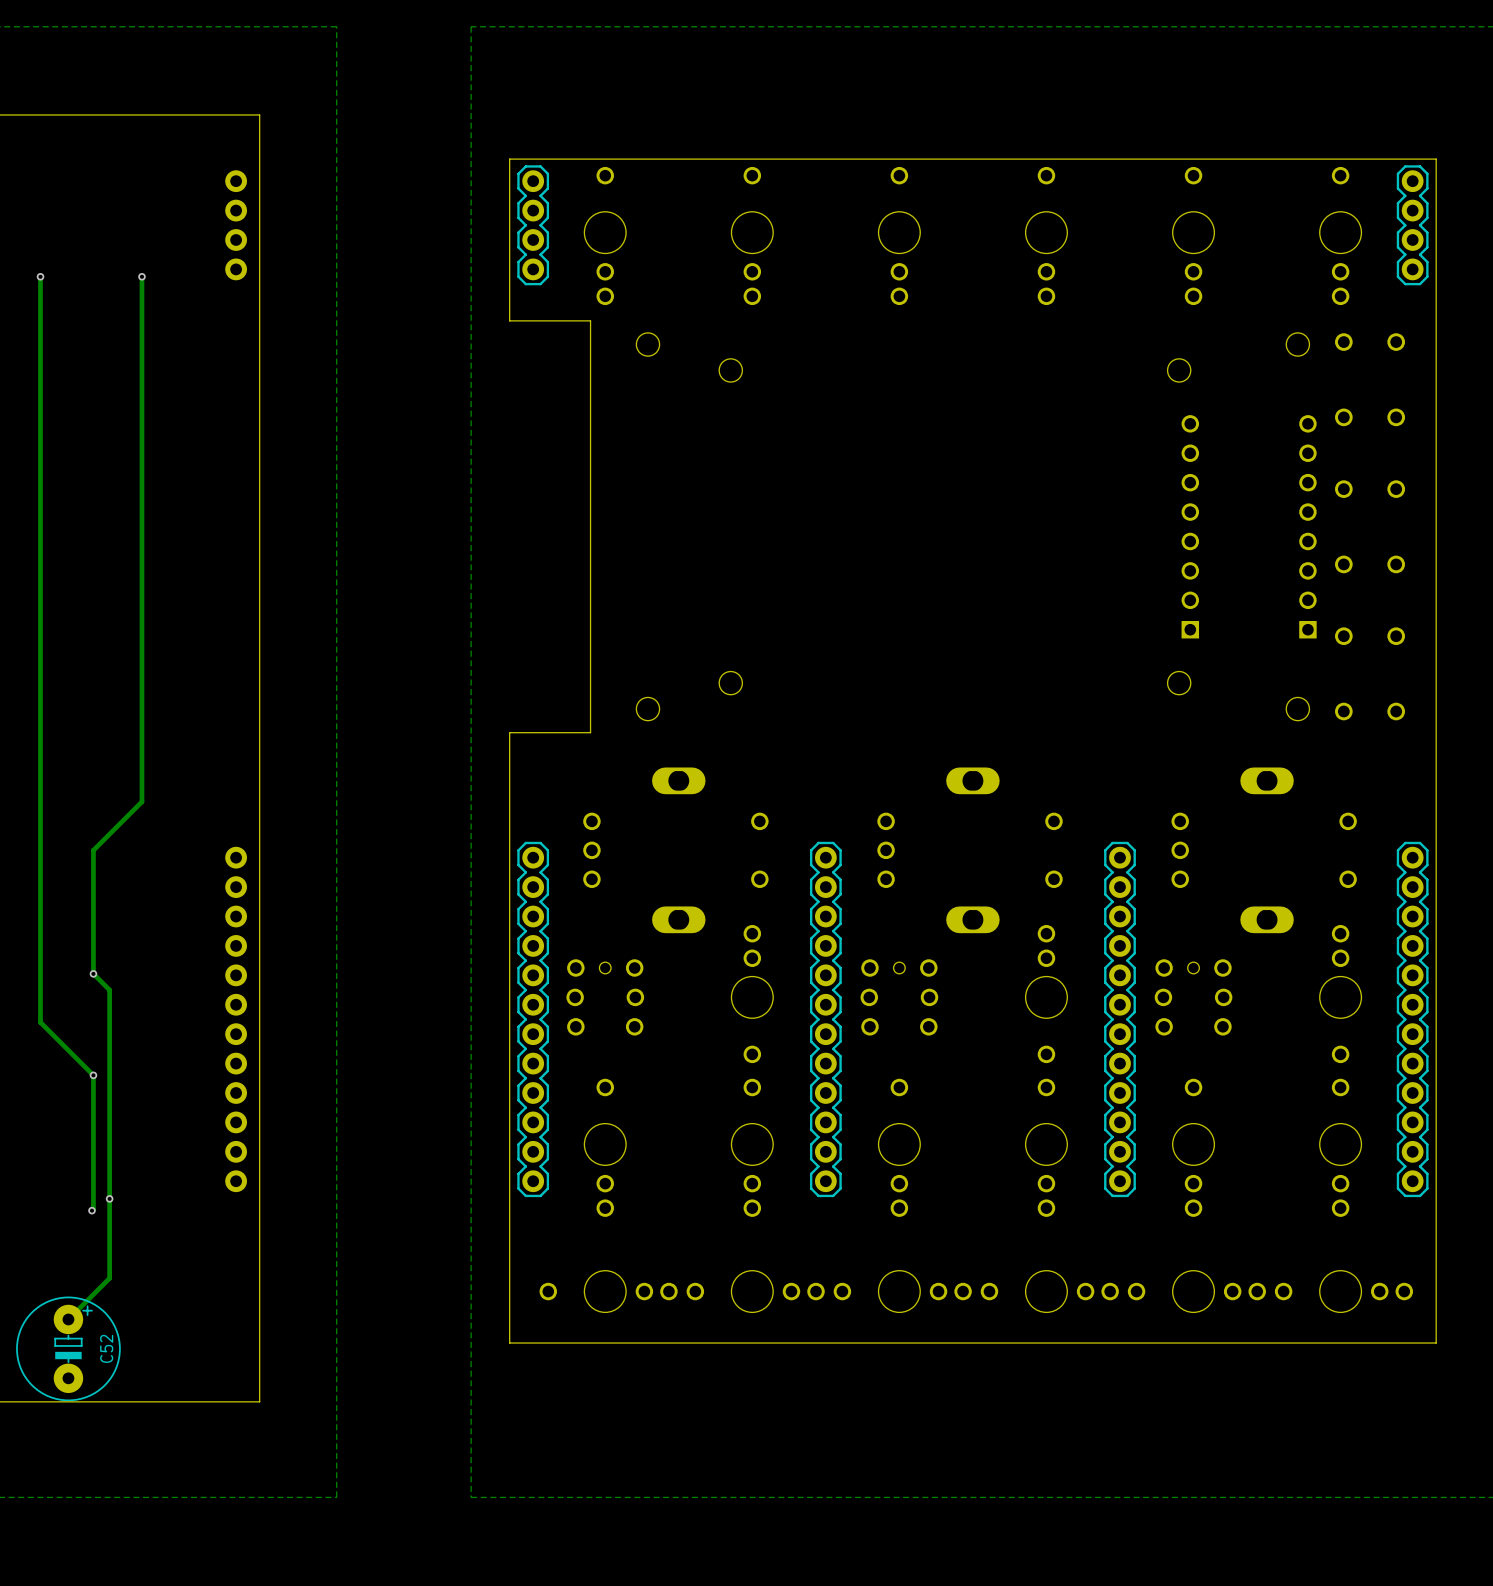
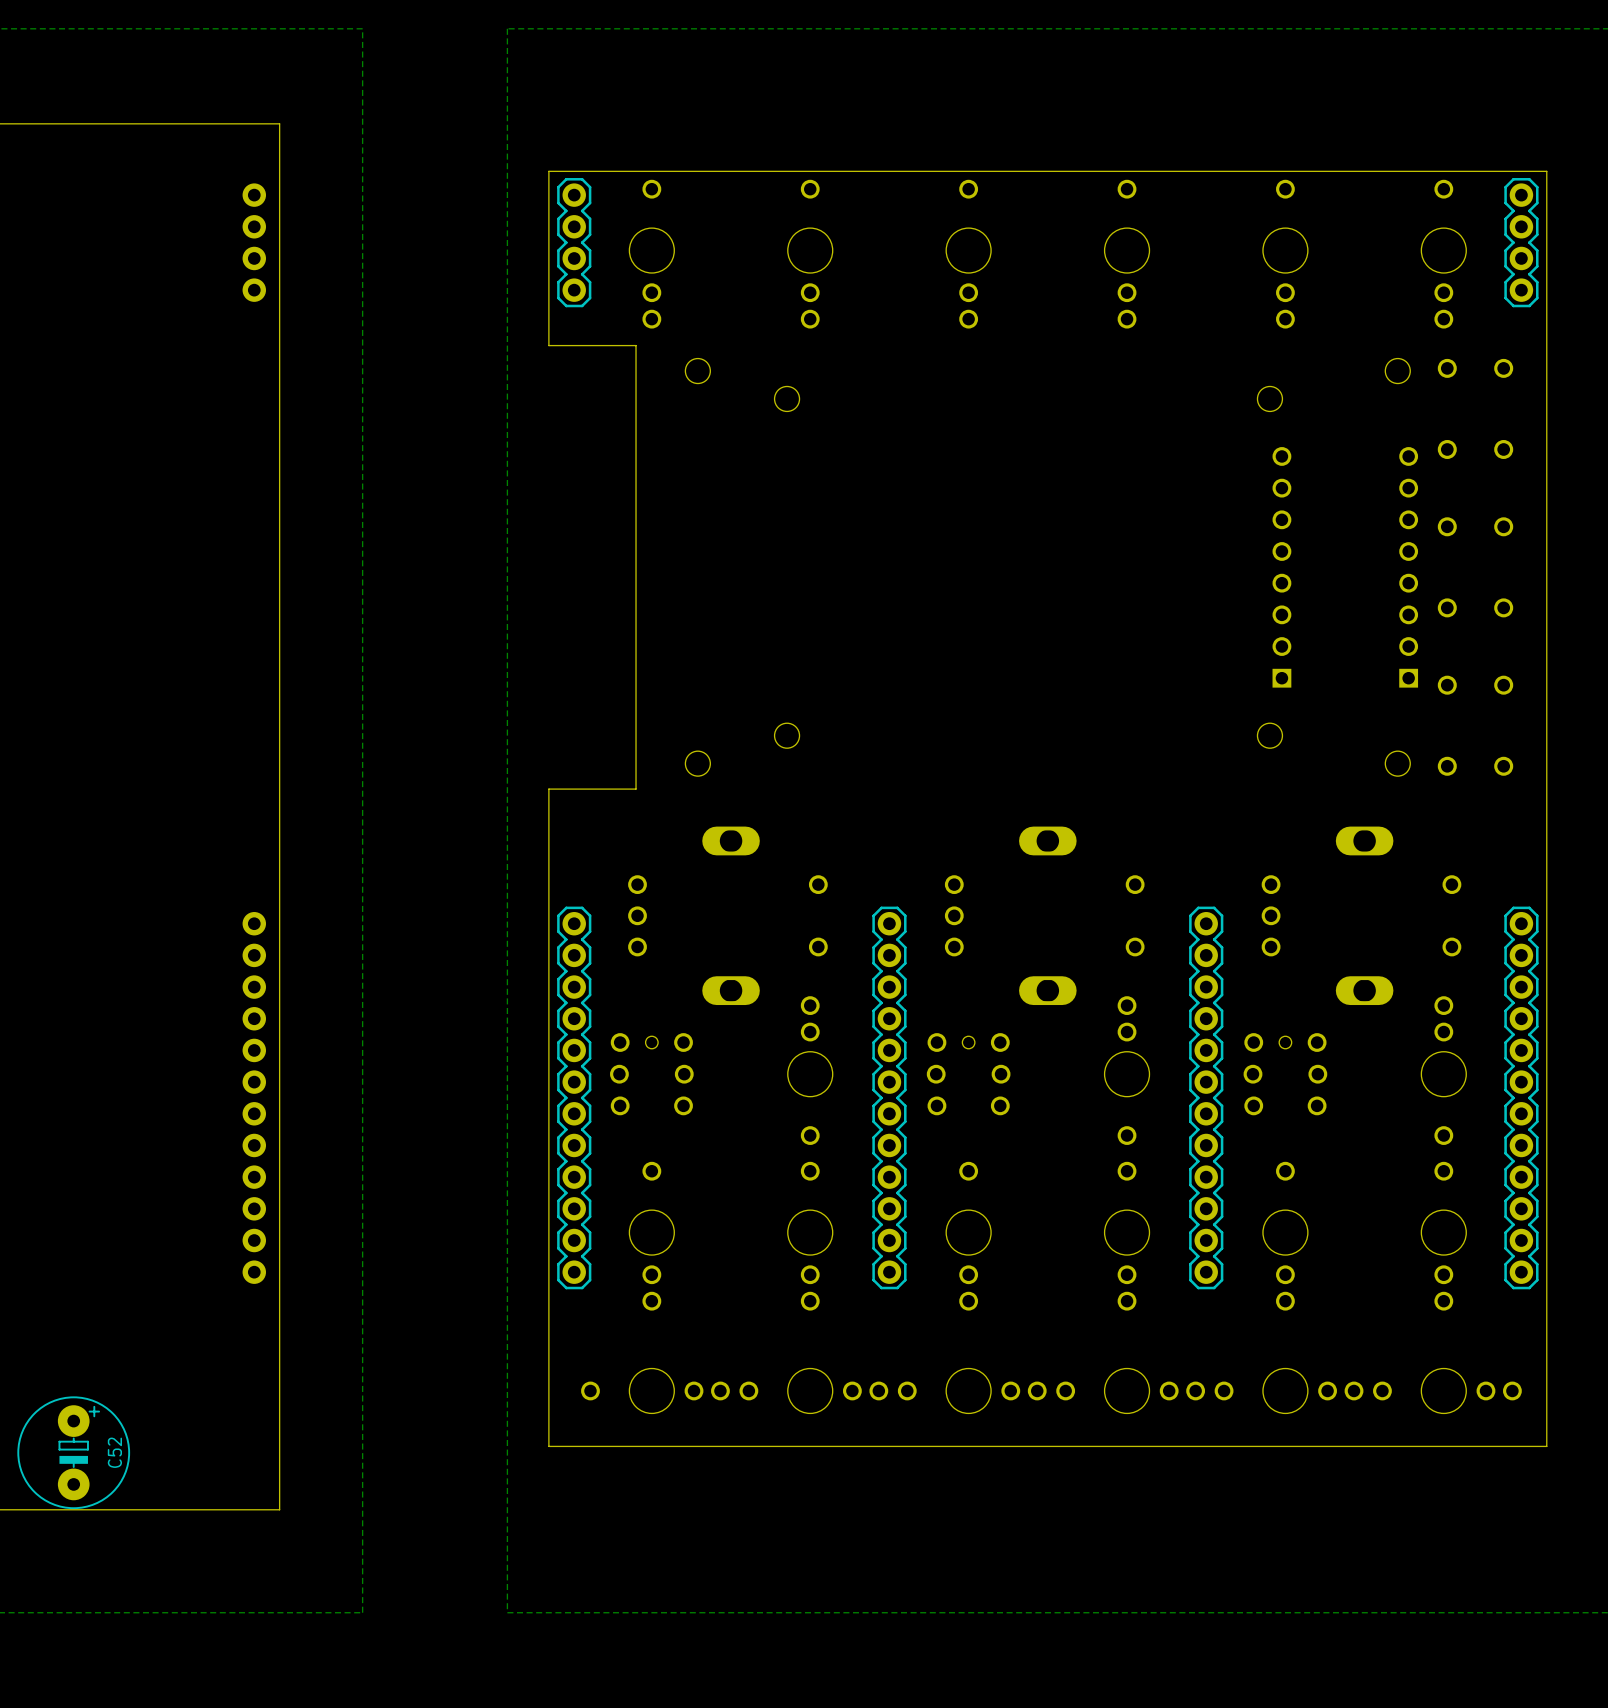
track: (40, 276) (40, 1022) (93, 1075) (91, 1210) -> none
via: (40, 276) -> none
track: (141, 276) (141, 801) (93, 850) (93, 973) (109, 990) (109, 1278) (68, 1319) -> none
via: (141, 276) -> none
via: (93, 973) -> none
via: (93, 1075) -> none
via: (109, 1198) -> none
via: (91, 1210) -> none

